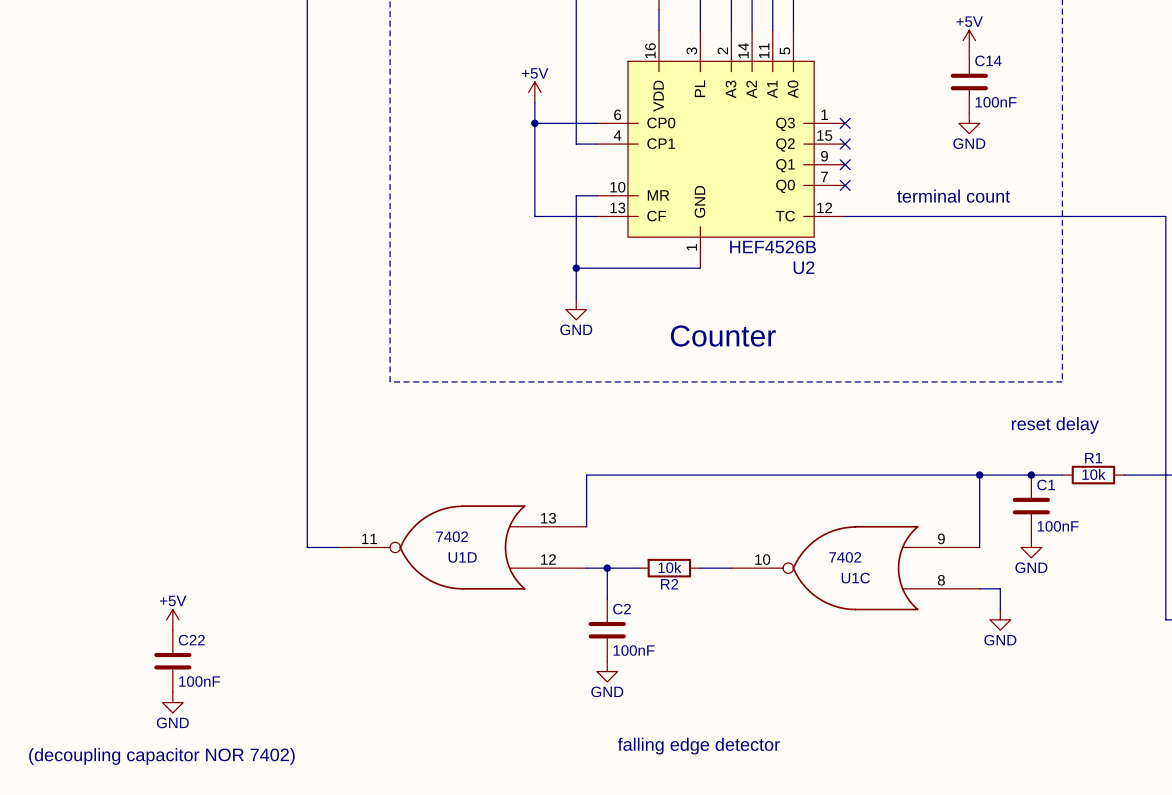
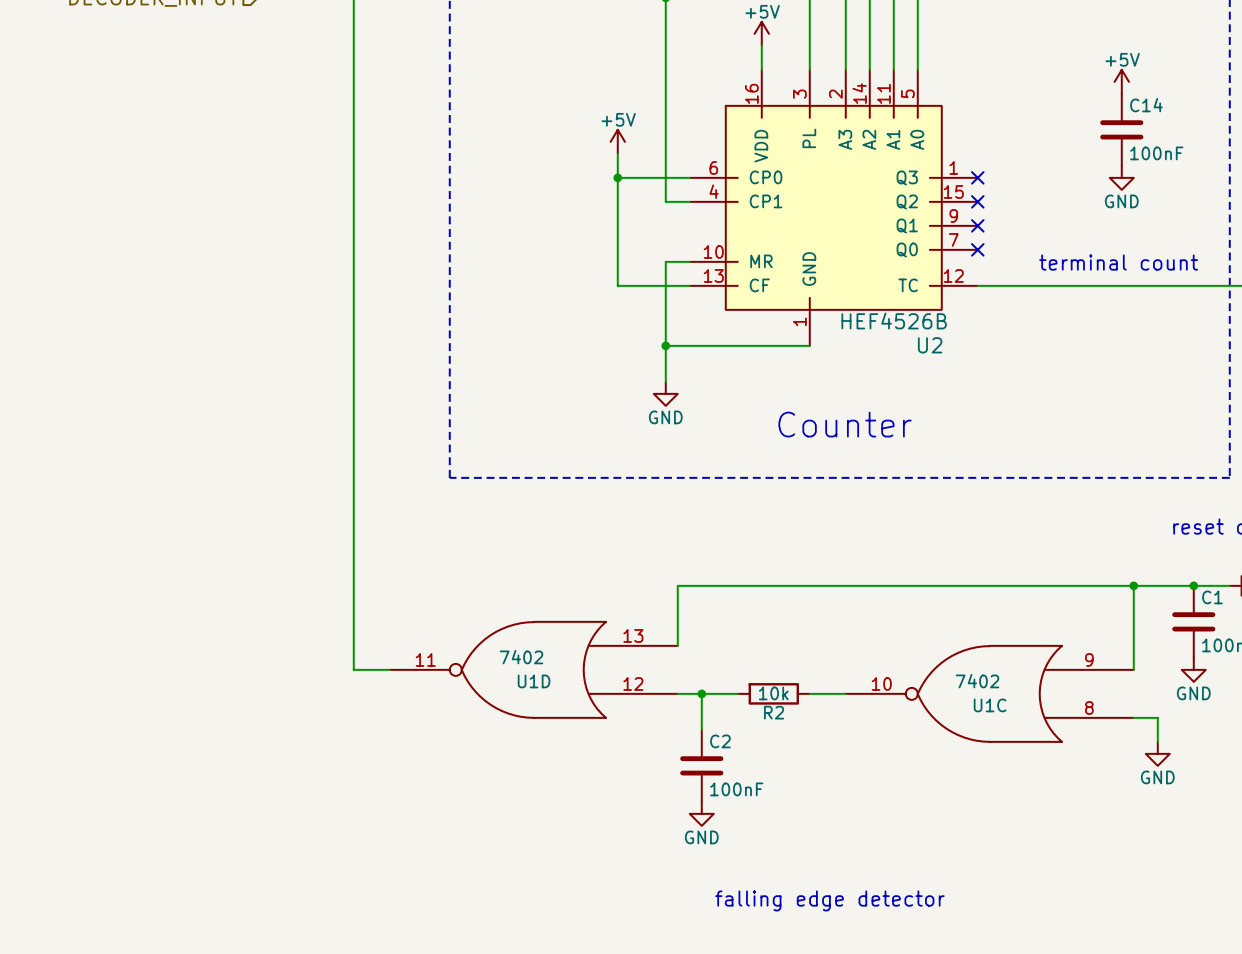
power symbol: +5V (172, 619) -> none
C22: 100nF (172, 661) -> none
power symbol: GND (172, 702) -> none
text: (decoupling capacitor NOR 7402) (161, 756) -> none

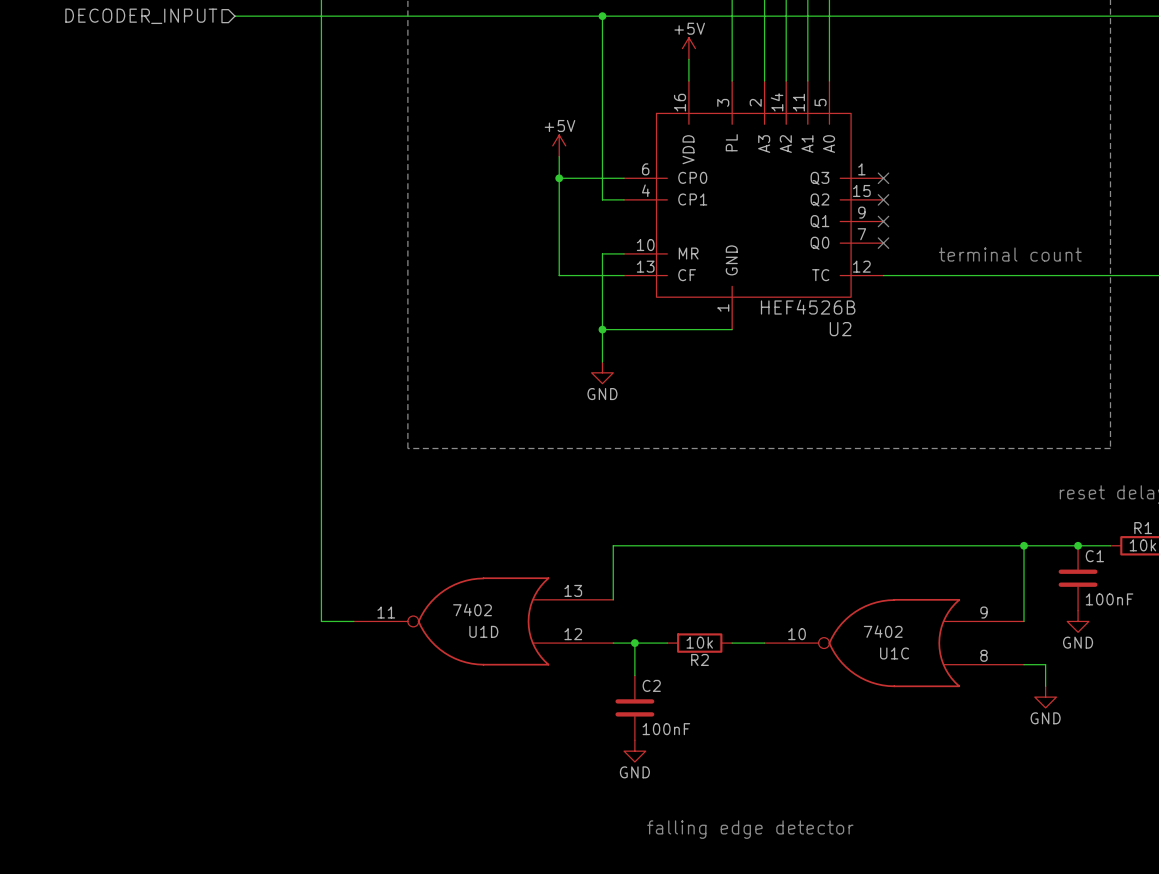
power symbol: +5V (1121, 81) -> none
C14: 100nF (1121, 129) -> none
power symbol: GND (1121, 177) -> none
text: Counter (845, 424) -> none

